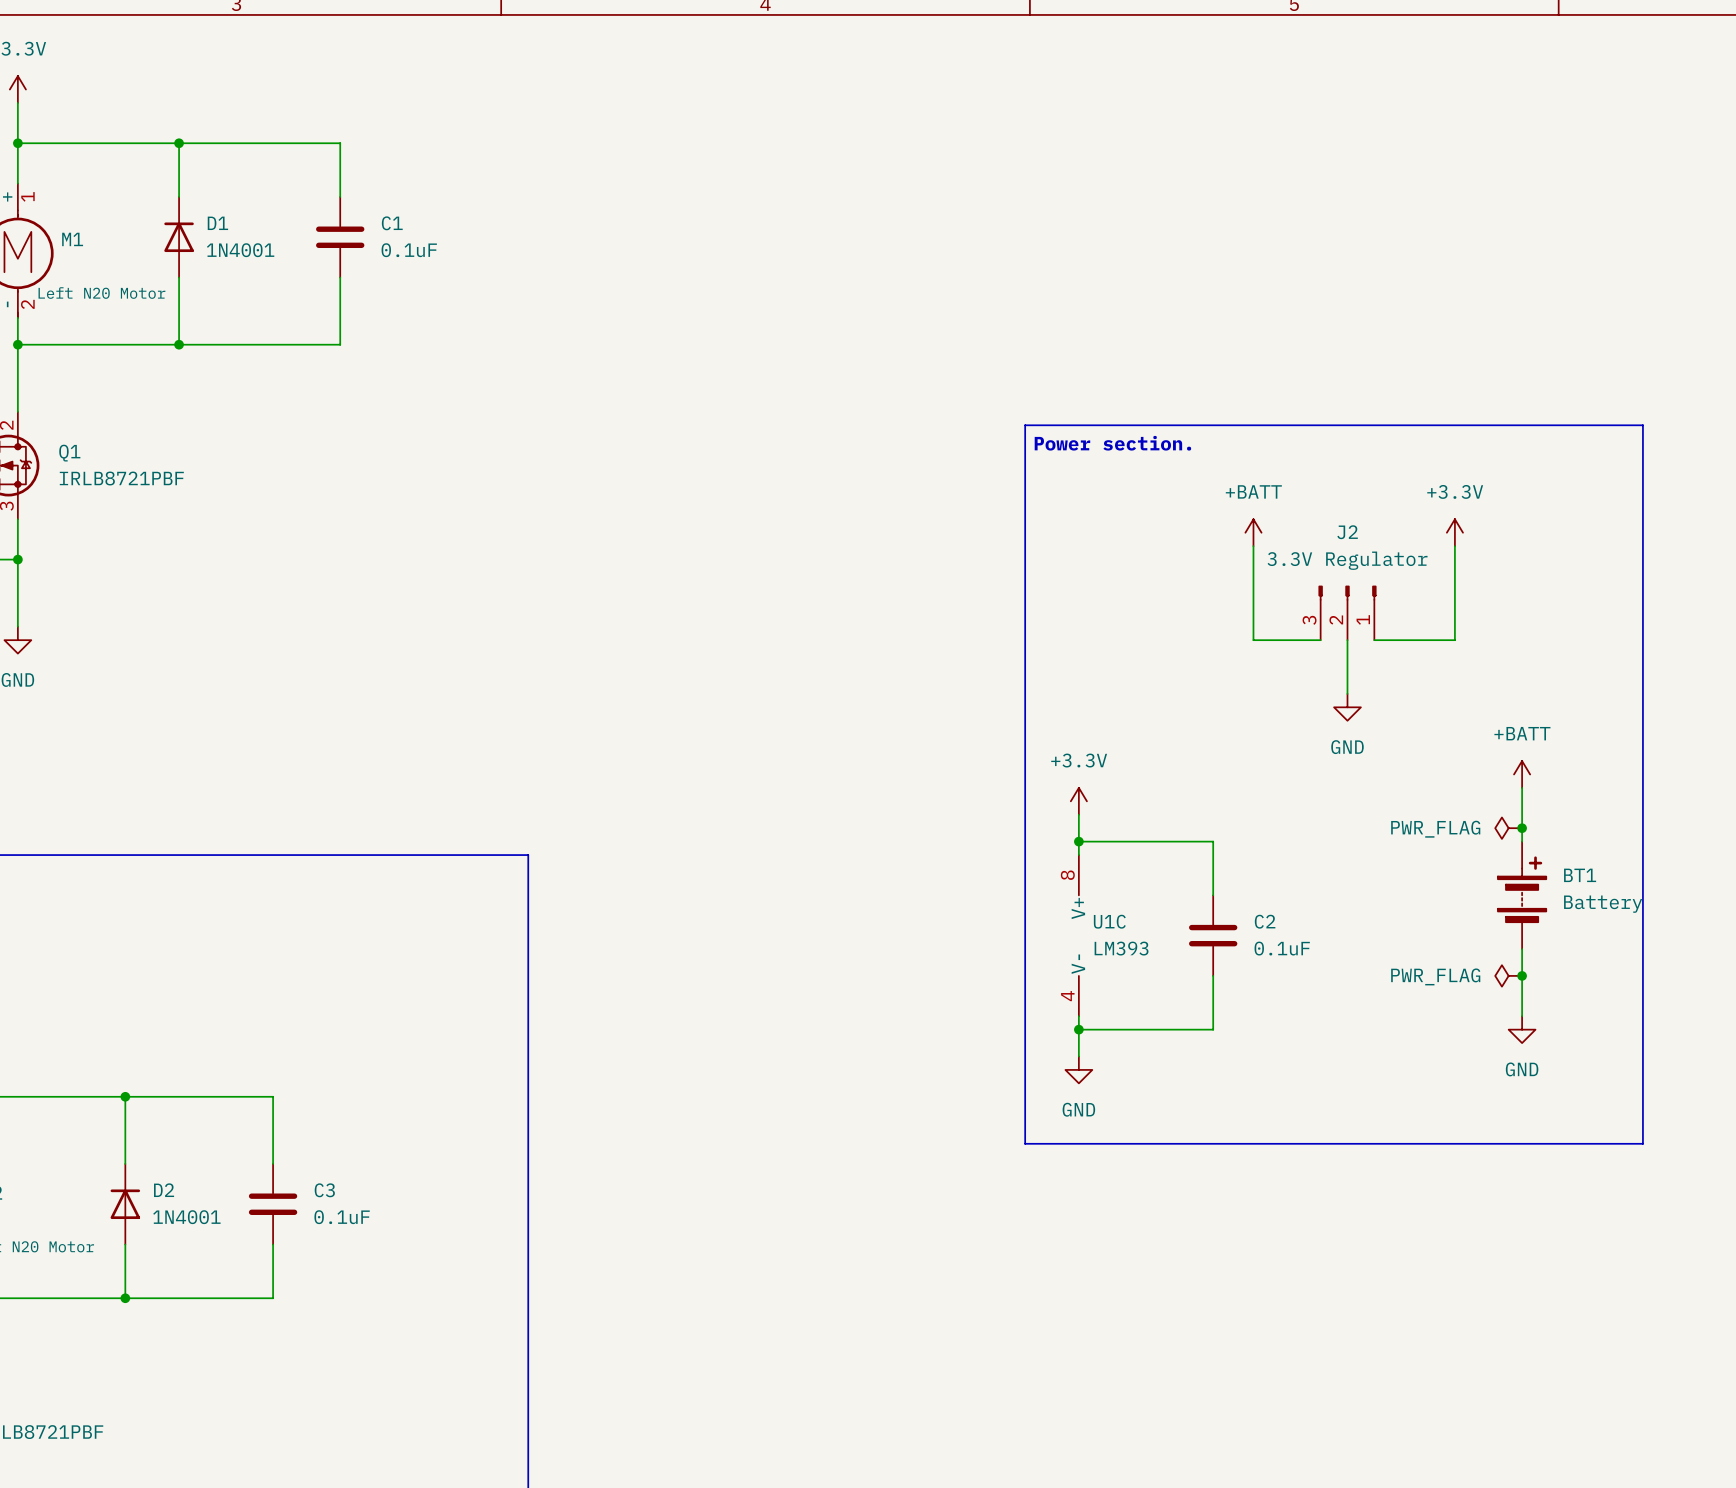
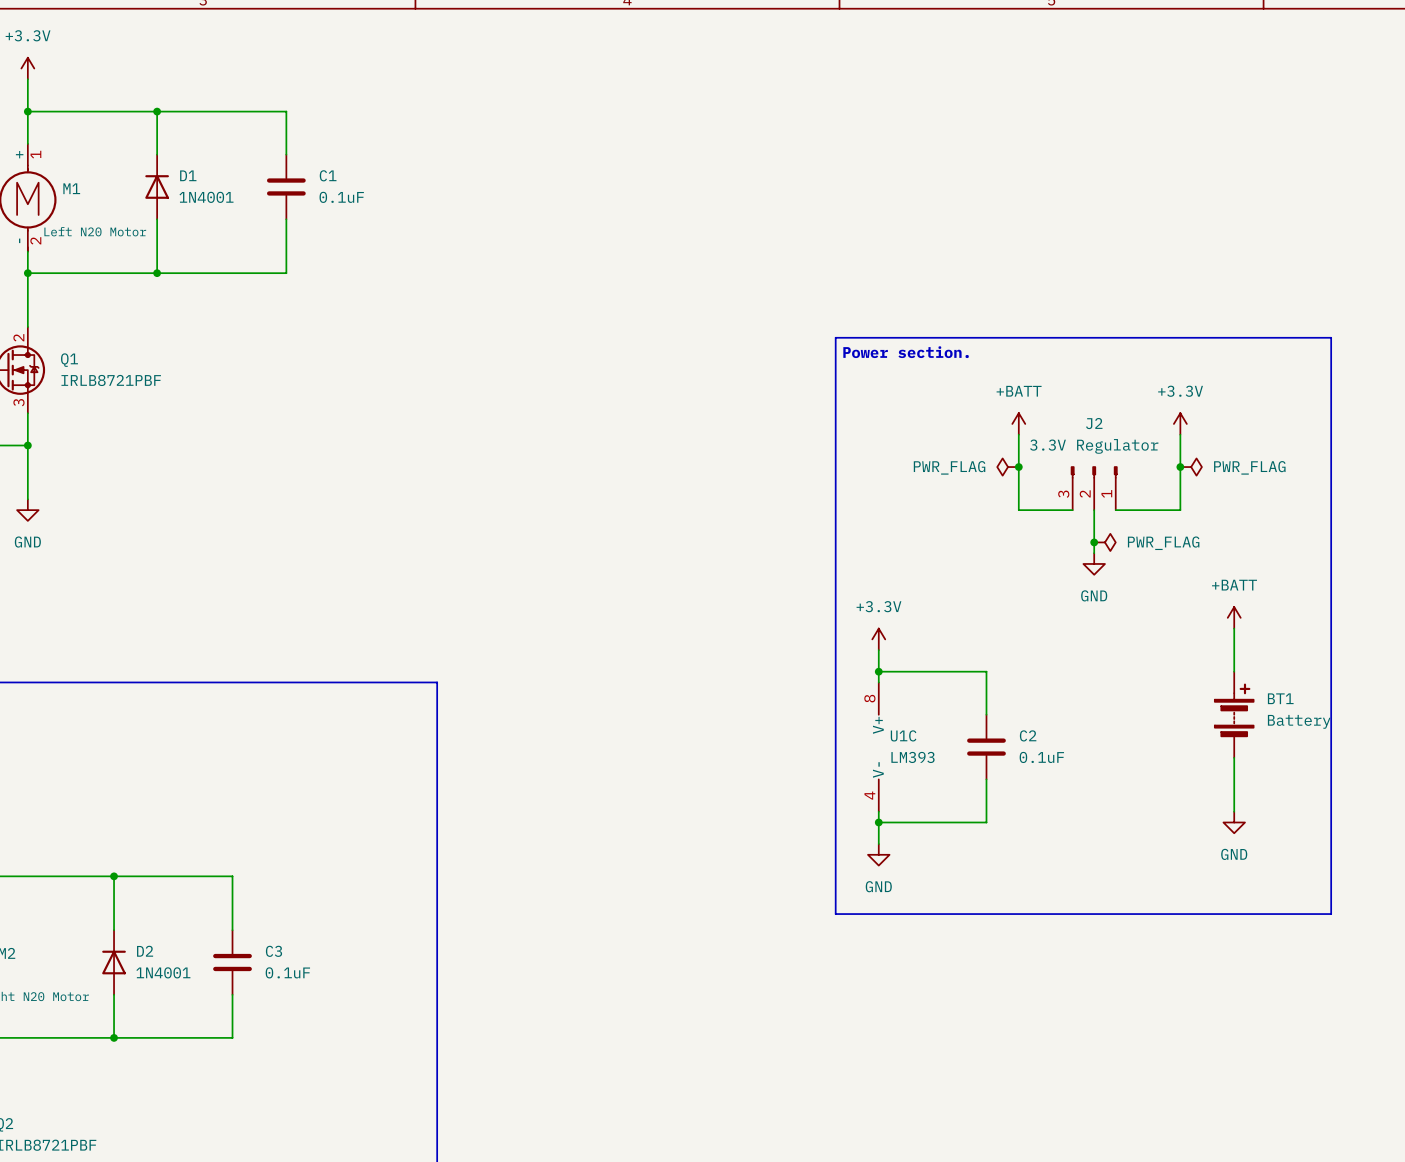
power symbol: none -> PWR_FLAG (1008, 467)
junction: none -> (1018, 467)
junction: none -> (1180, 467)
power symbol: none -> PWR_FLAG (1191, 467)
junction: none -> (1094, 542)
power symbol: none -> PWR_FLAG (1104, 542)
power symbol: PWR_FLAG (1508, 828) -> none
junction: (1522, 828) -> none
power symbol: PWR_FLAG (1508, 975) -> none
junction: (1522, 975) -> none

